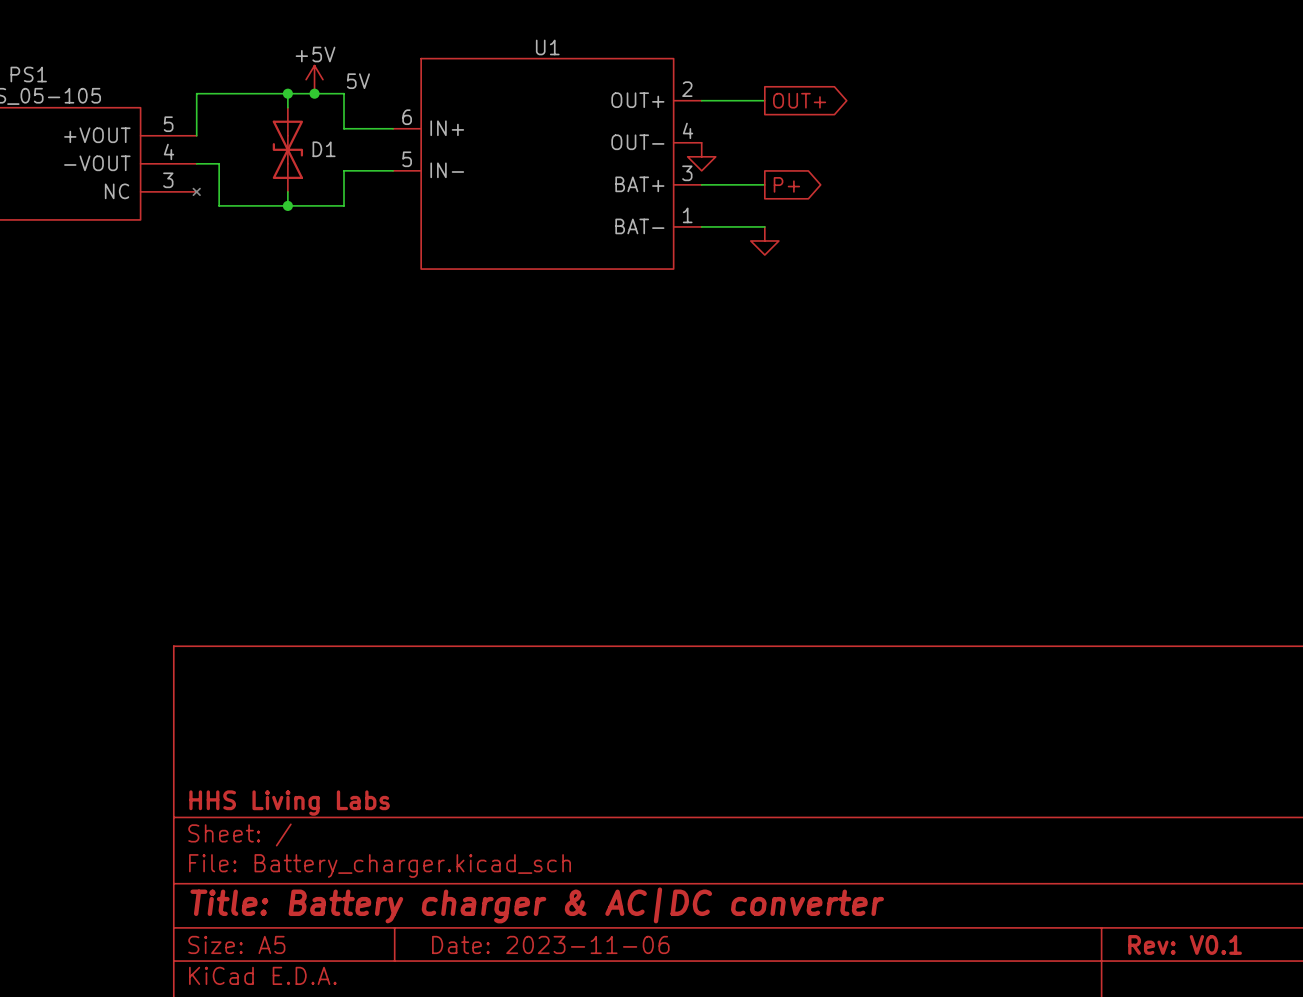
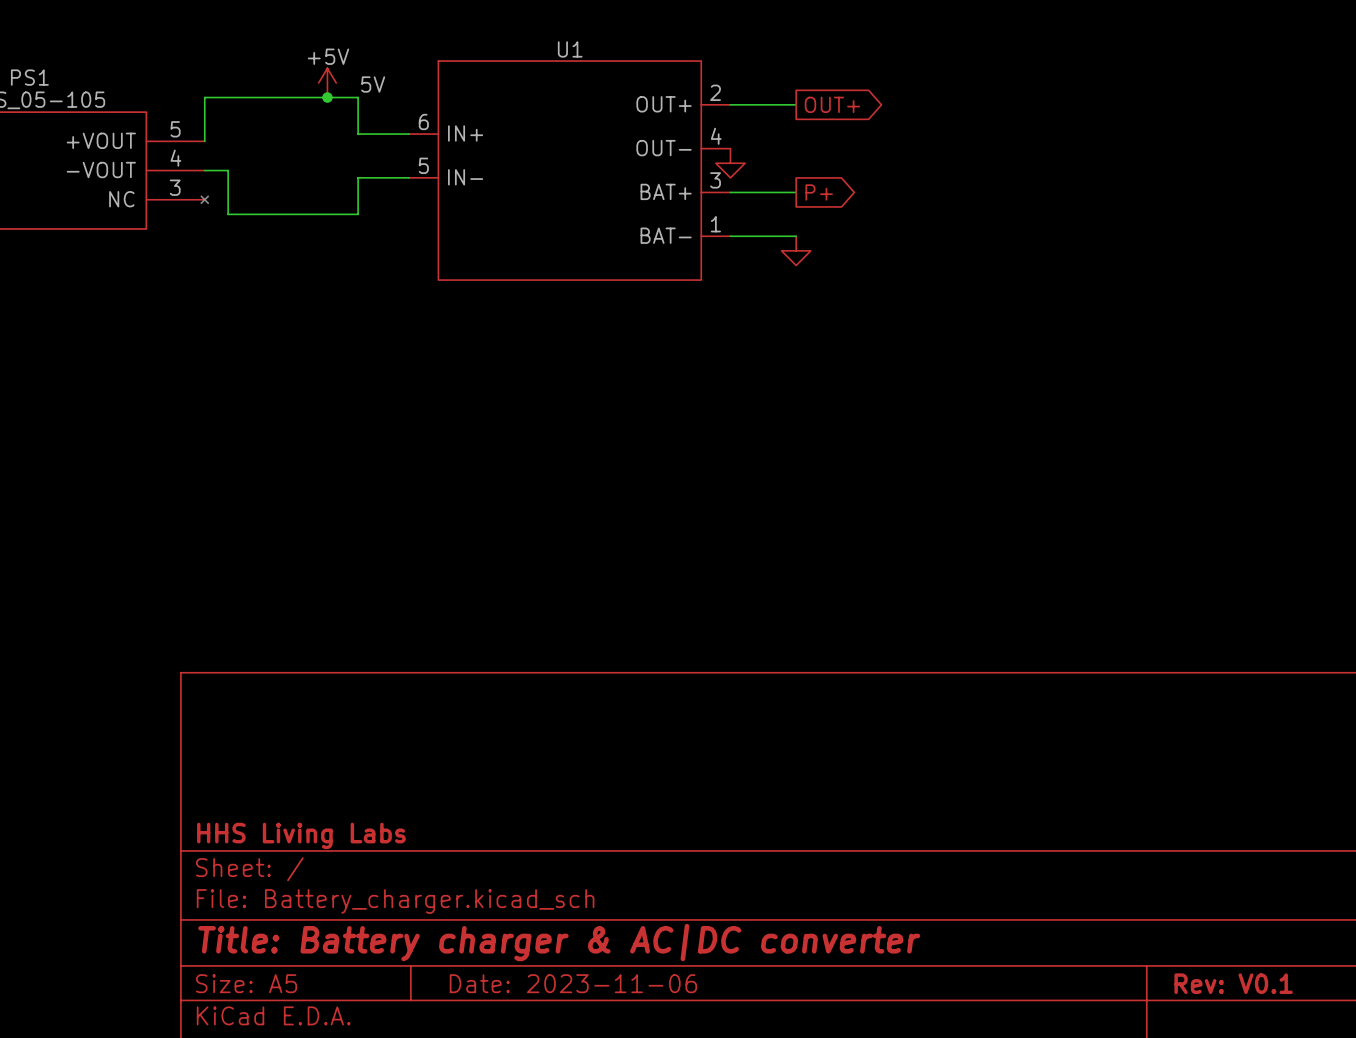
wire: (287, 93) (287, 107) -> none
junction: (287, 93) -> none
D1: (287, 149) -> none
wire: (287, 191) (287, 205) -> none
junction: (287, 205) -> none

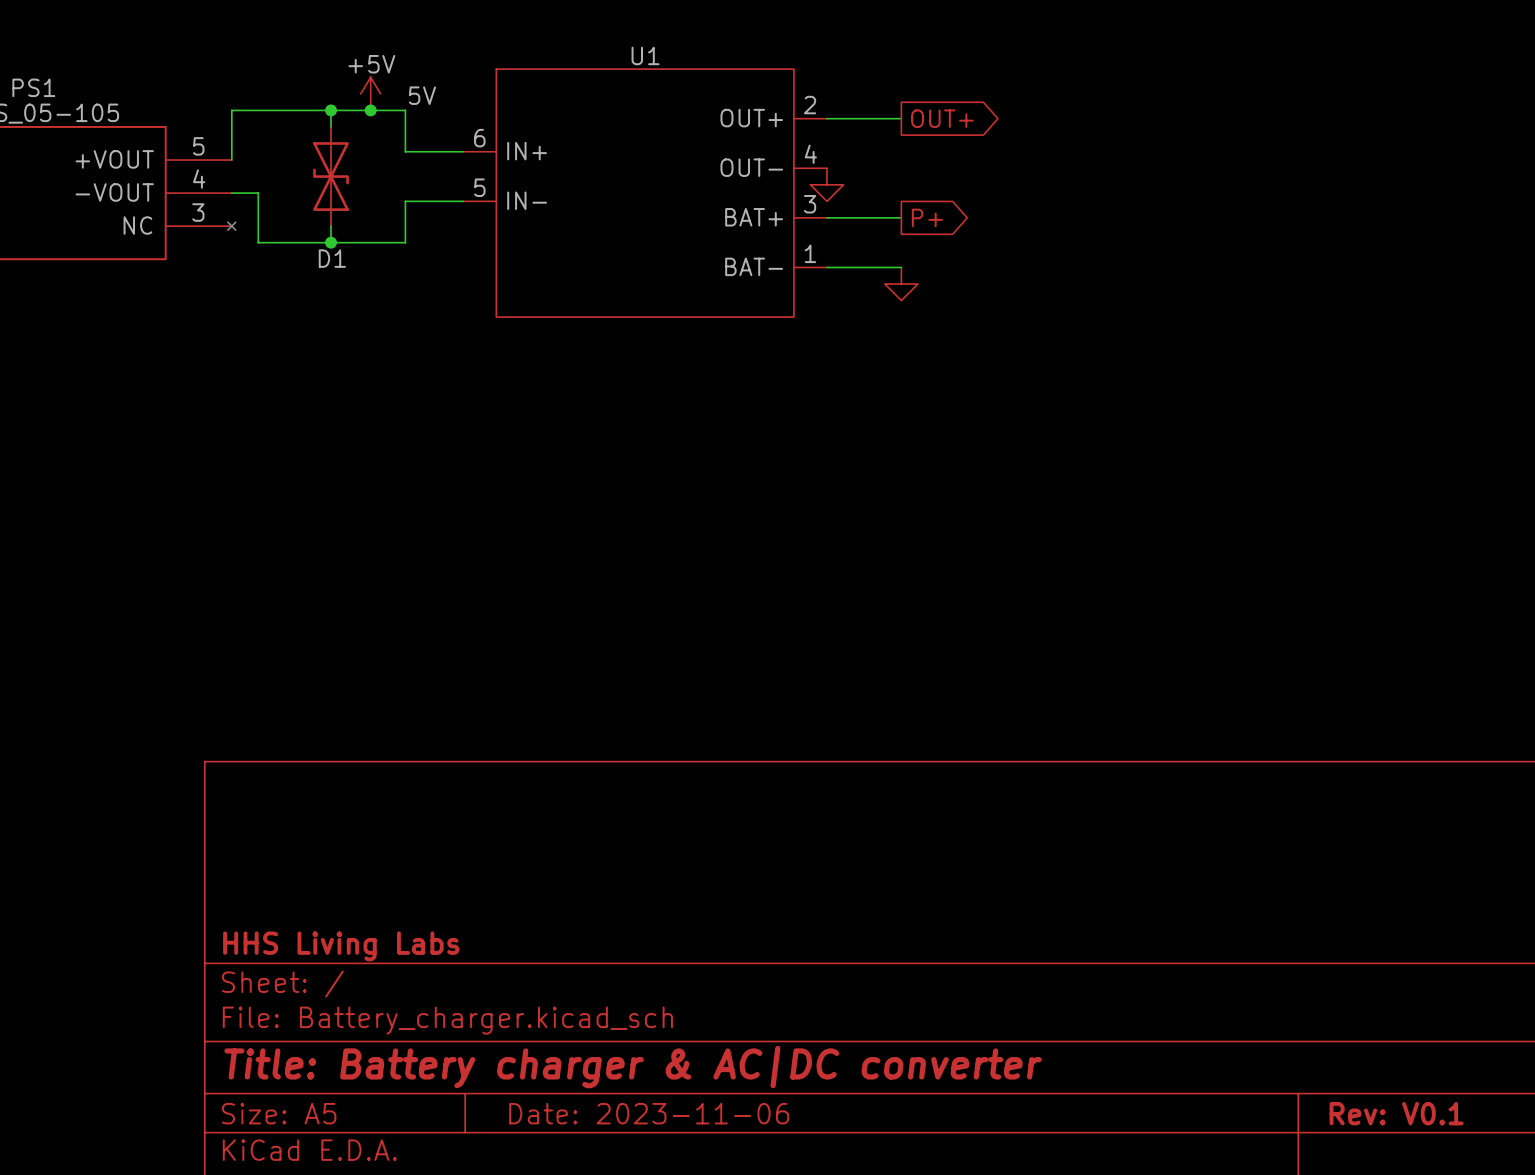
wire: none -> (331, 110) (331, 126)
junction: none -> (331, 110)
D1: none -> (331, 176)
wire: none -> (331, 226) (331, 242)
junction: none -> (331, 242)

